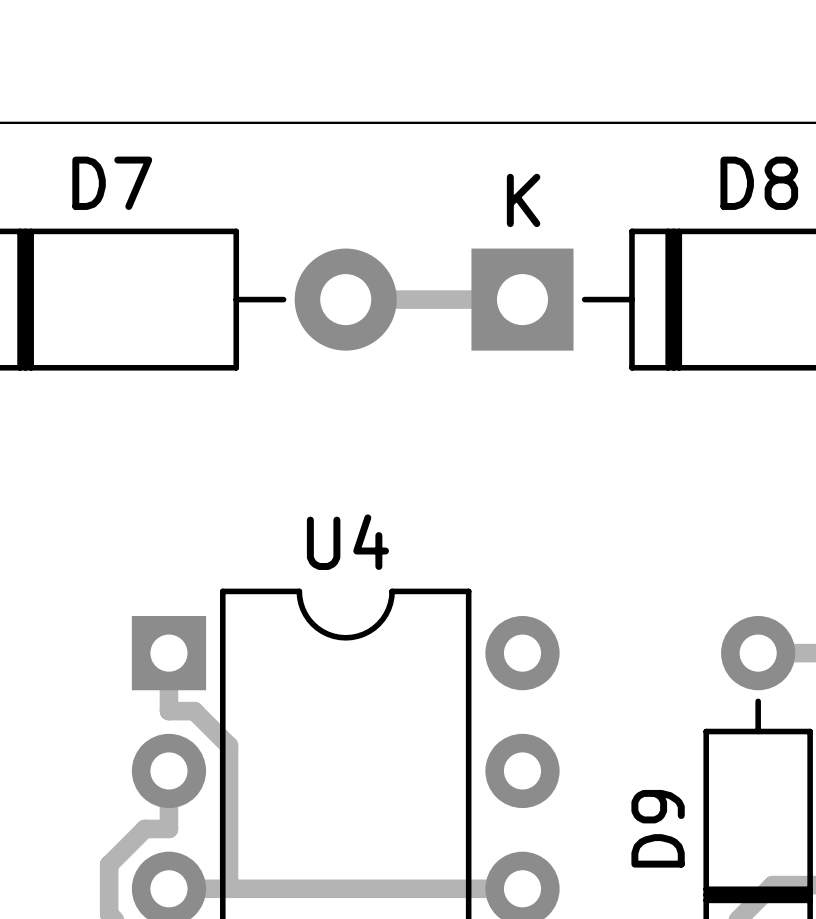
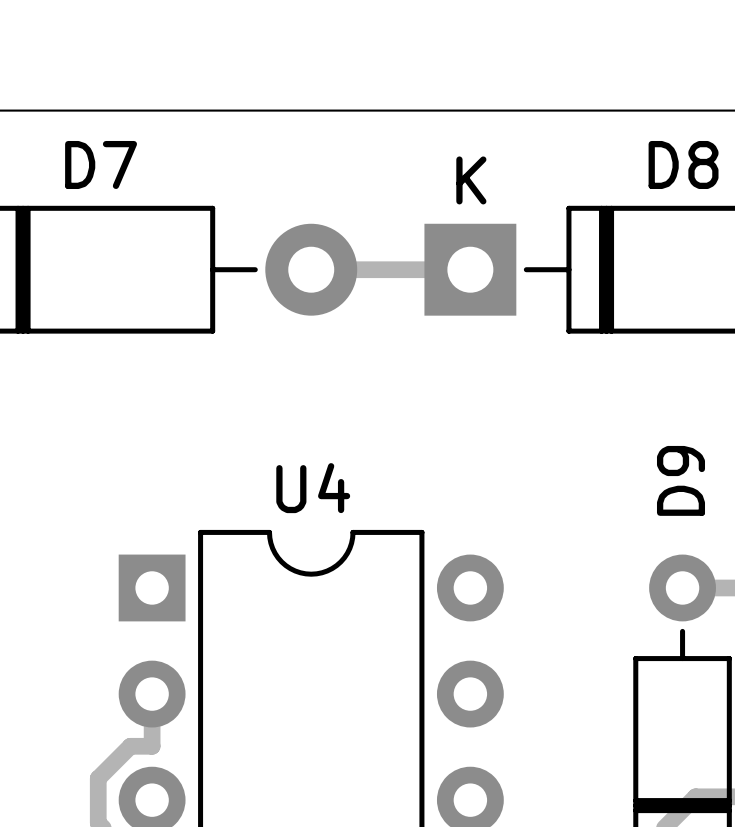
track: (168, 653) (168, 711) (194, 711) (229, 745) (229, 888) -> none
D9 name position: D9 (658, 828) -> D9 (680, 480)
track: (168, 888) (522, 888) -> none

